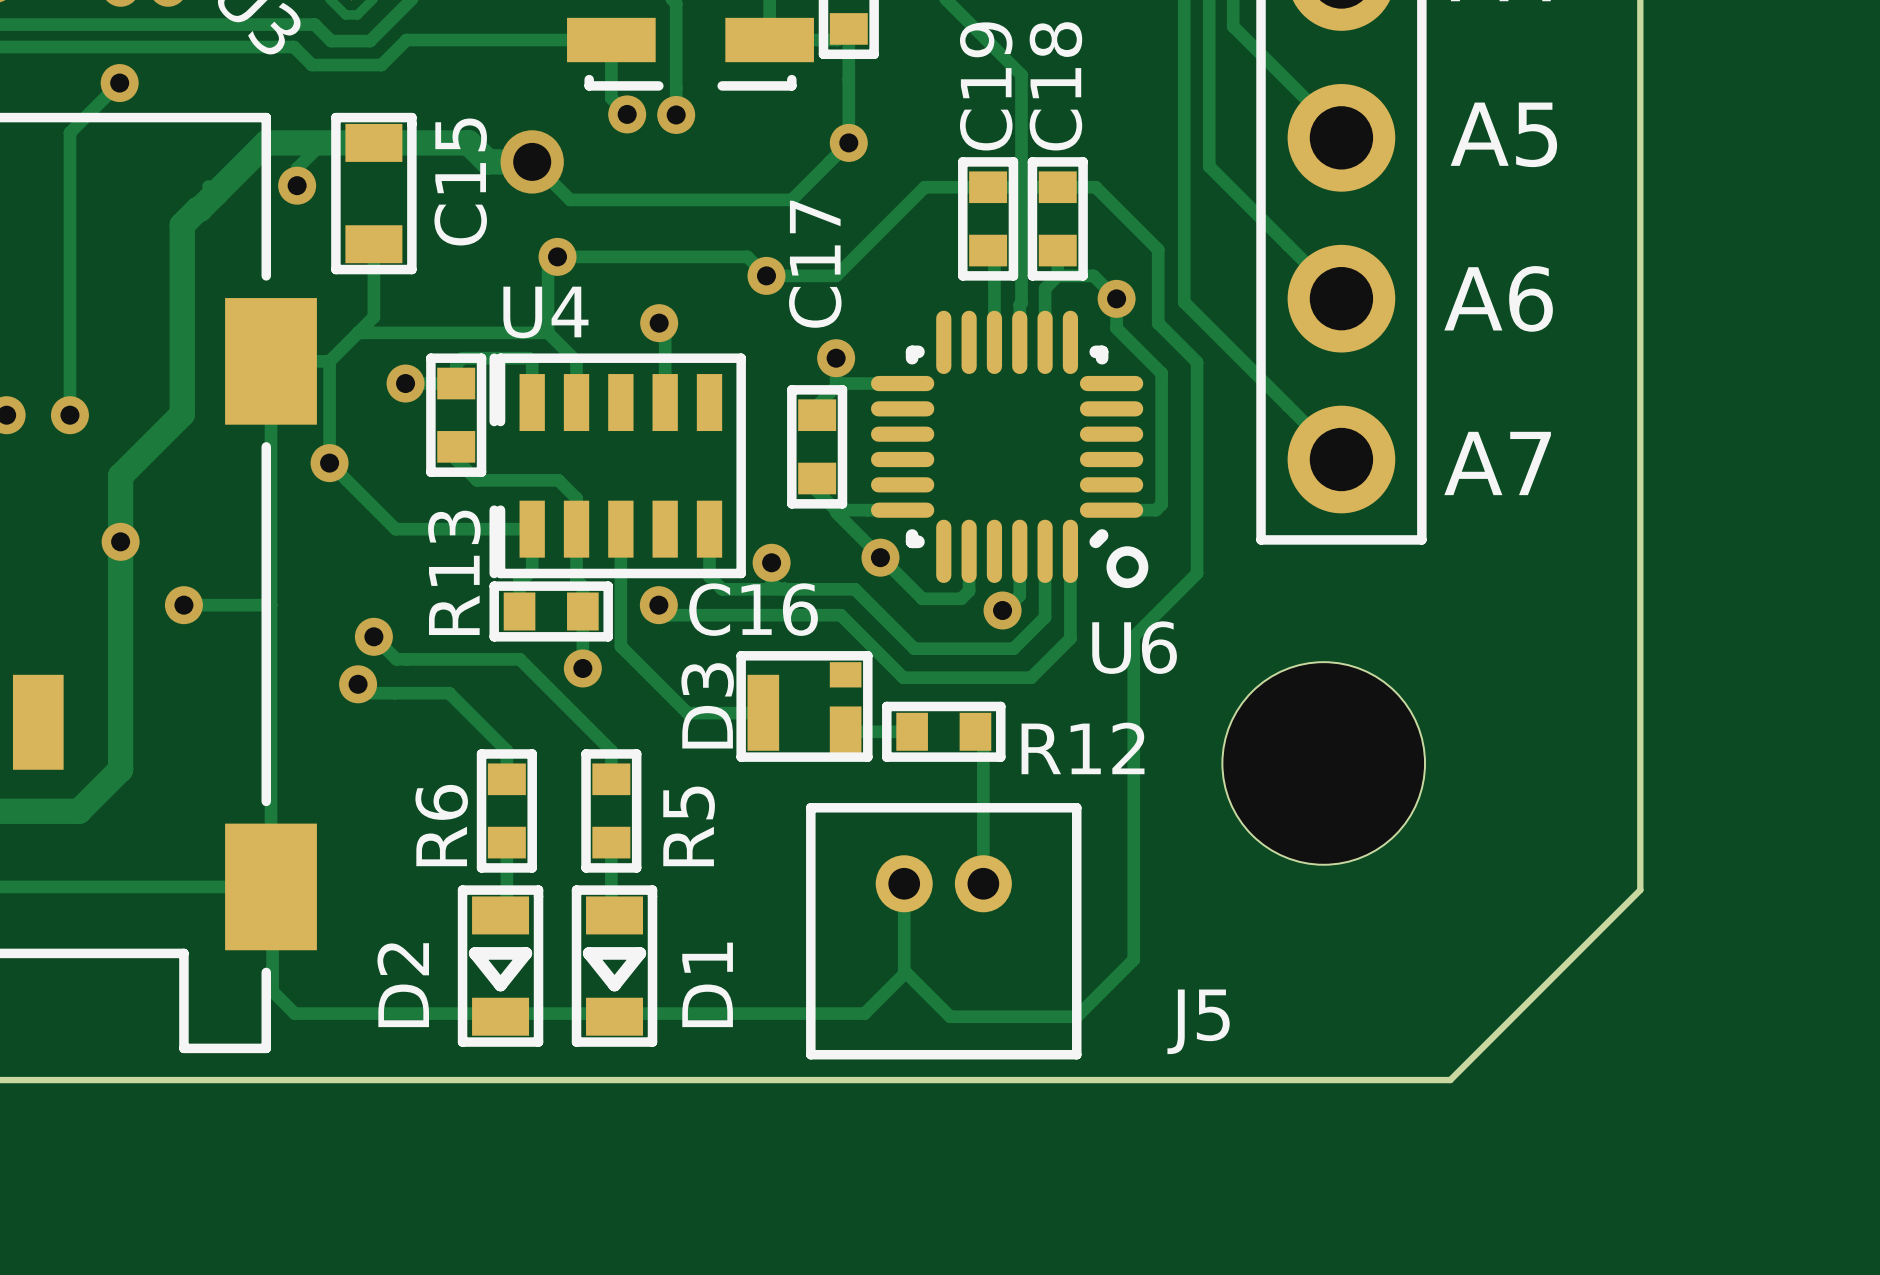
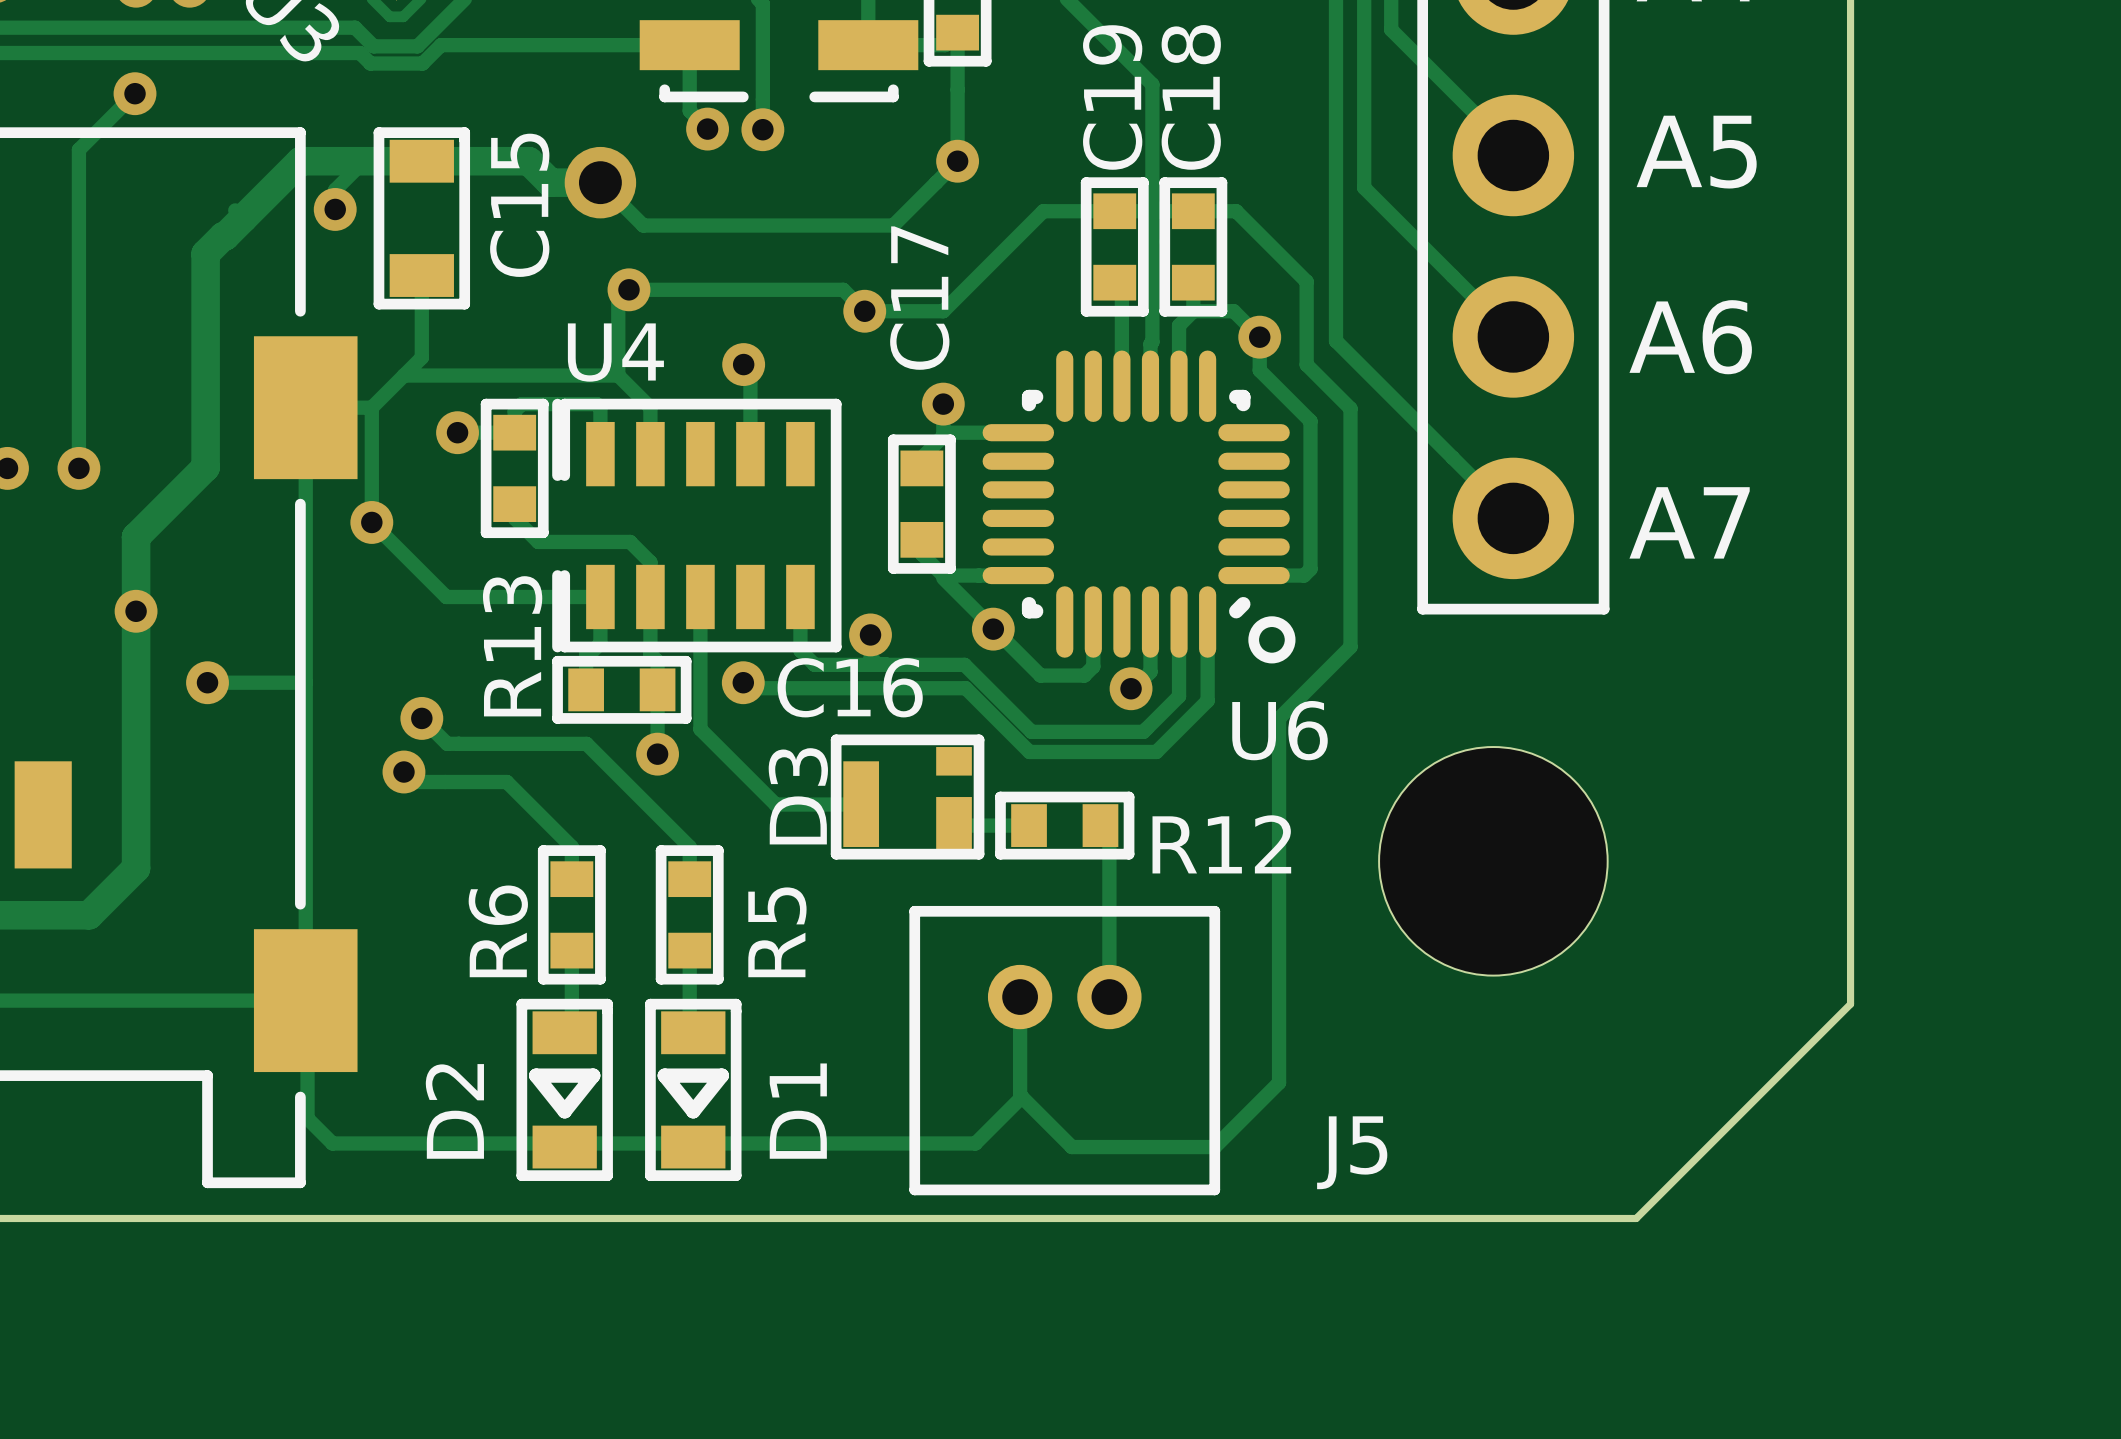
track: (406, 40) (381, 65) (312, 65) (293, 46) -> (458, 45) (441, 45) (422, 63) (370, 63) (359, 53) (331, 53)
track: (663, 610) (668, 615) (840, 615) (903, 677) (1031, 677) (1070, 638) (1070, 621) -> (748, 688) (965, 688) (1029, 751) (1156, 751) (1207, 700)

